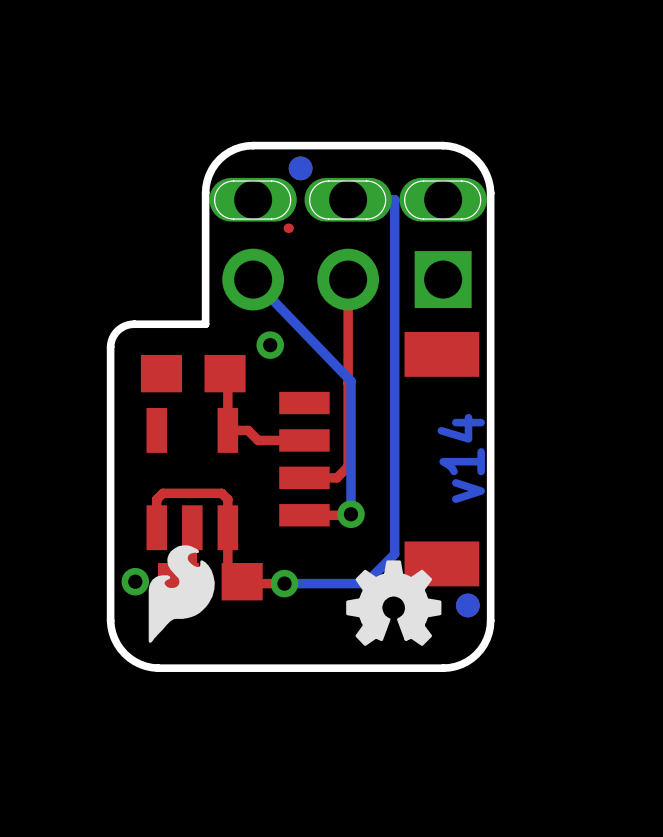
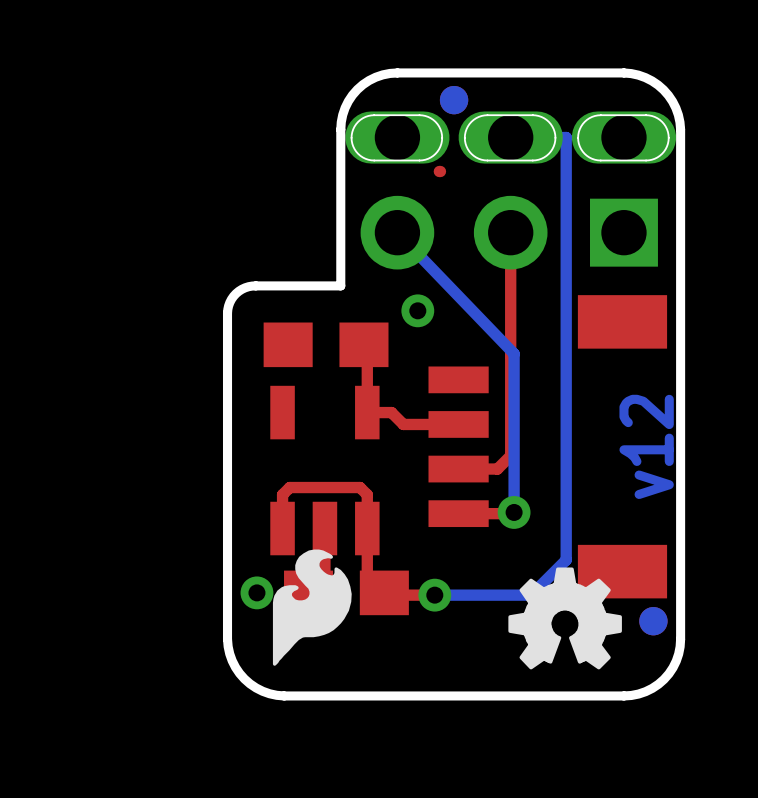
text: v14 (461, 458) -> v12 (646, 446)

